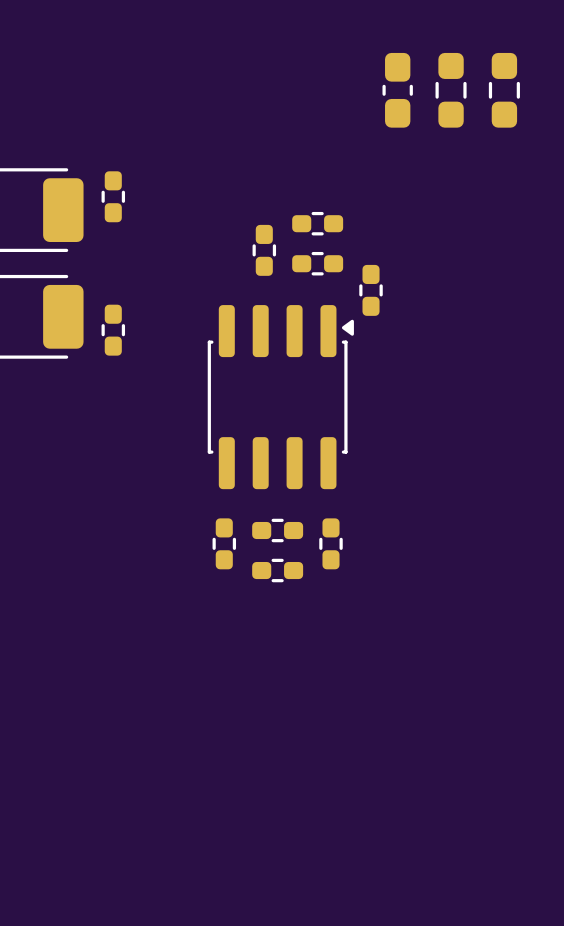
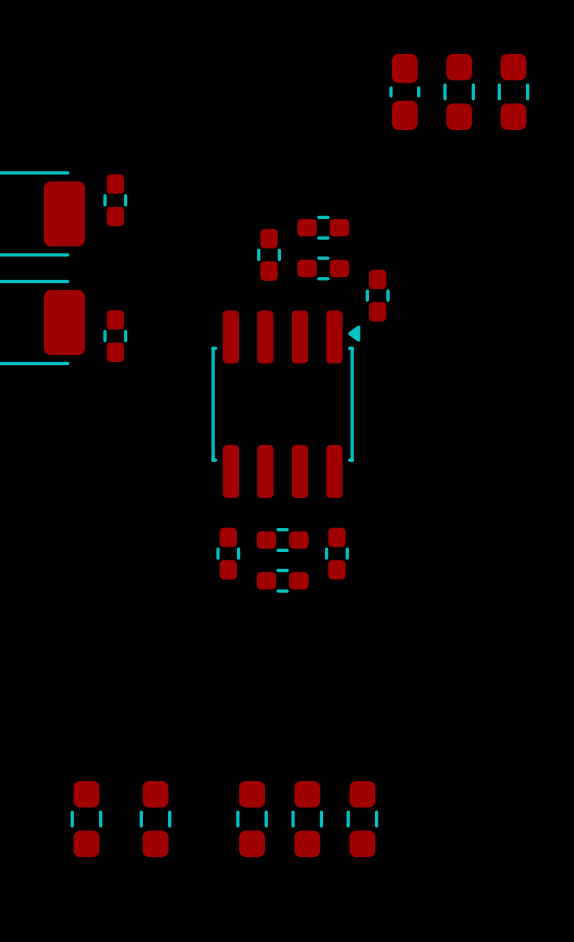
part: none -> (86, 819)
part: none -> (155, 819)
part: none -> (252, 819)
part: none -> (307, 819)
part: none -> (362, 819)

